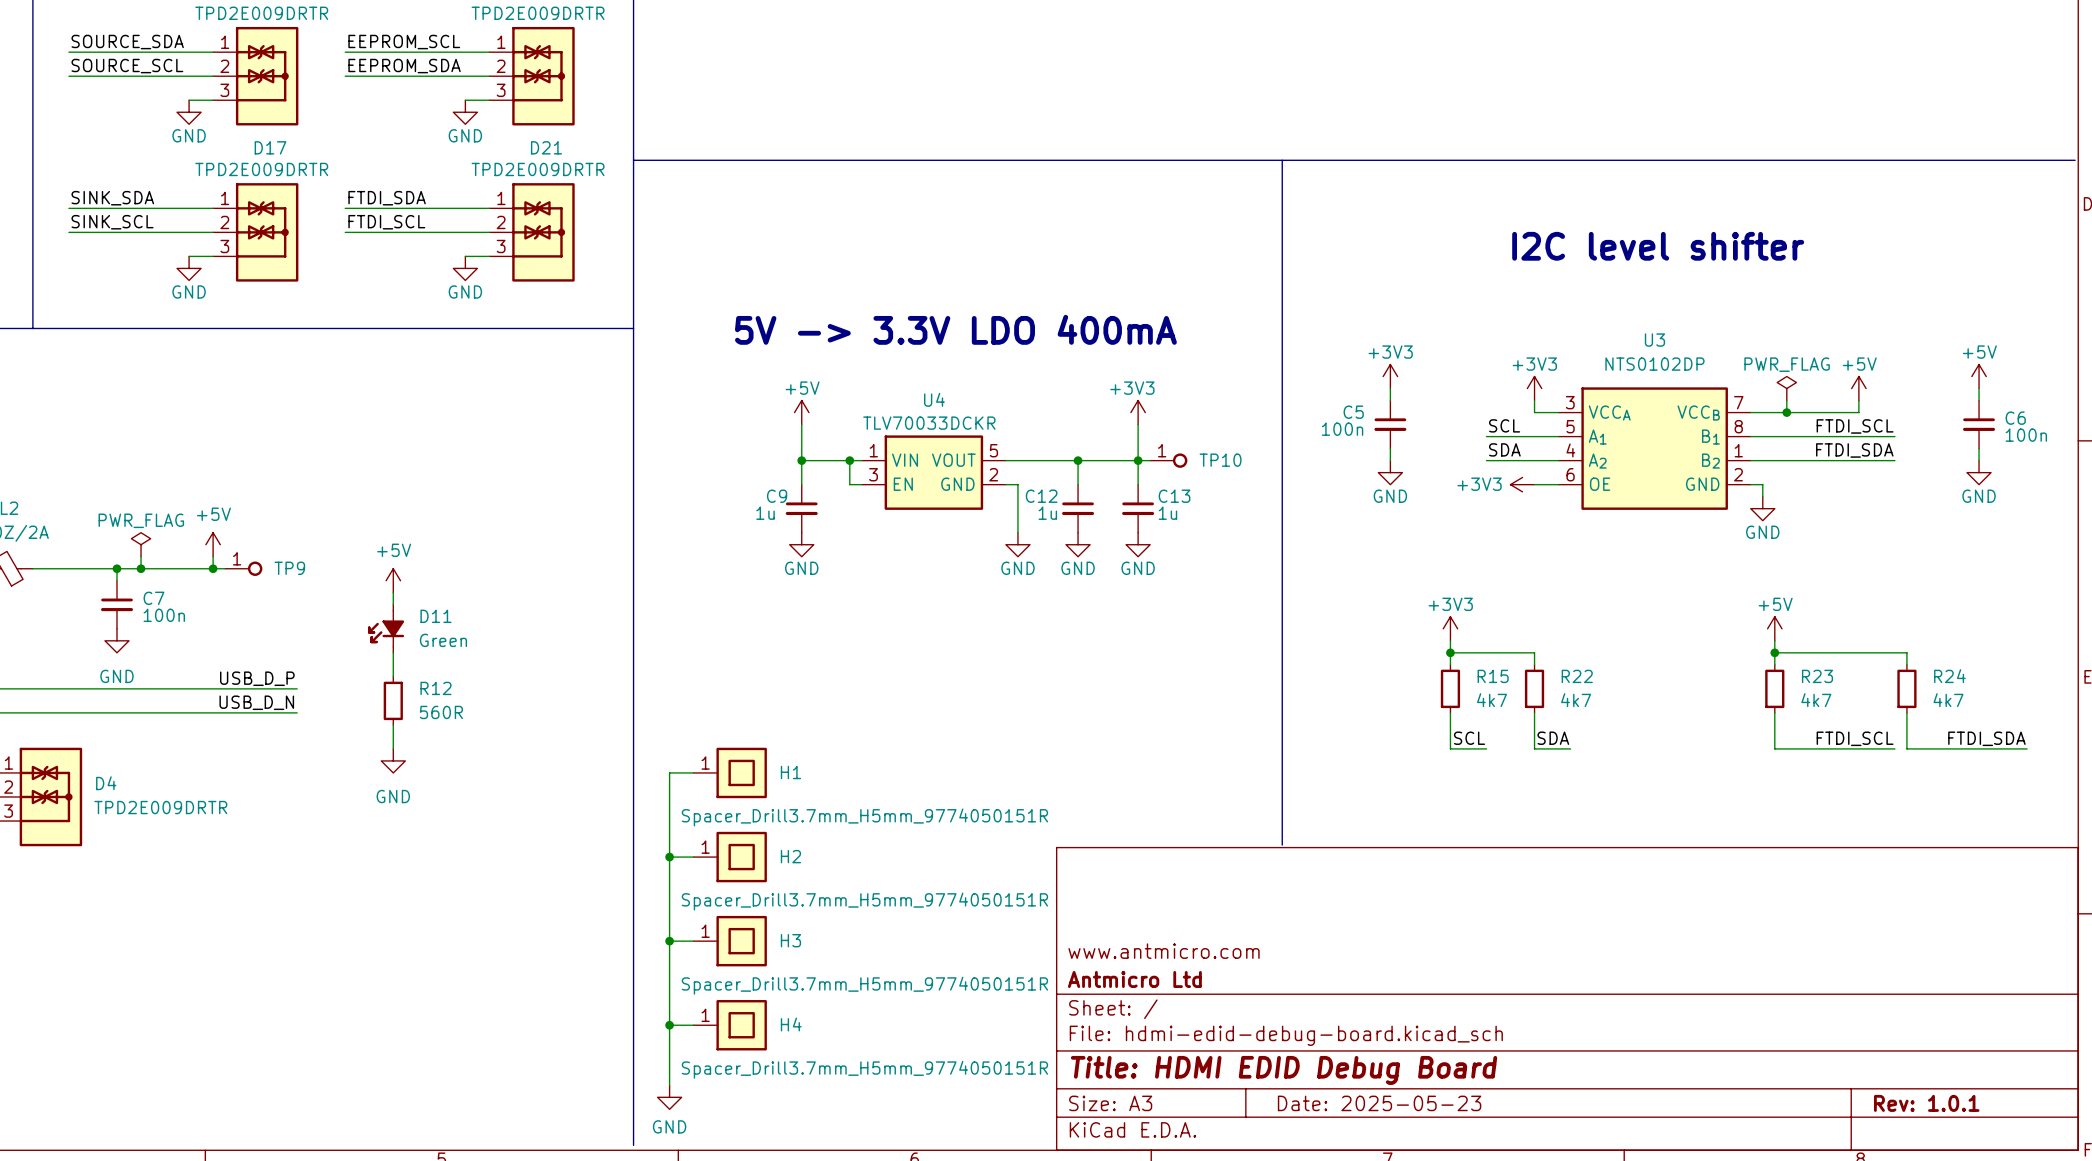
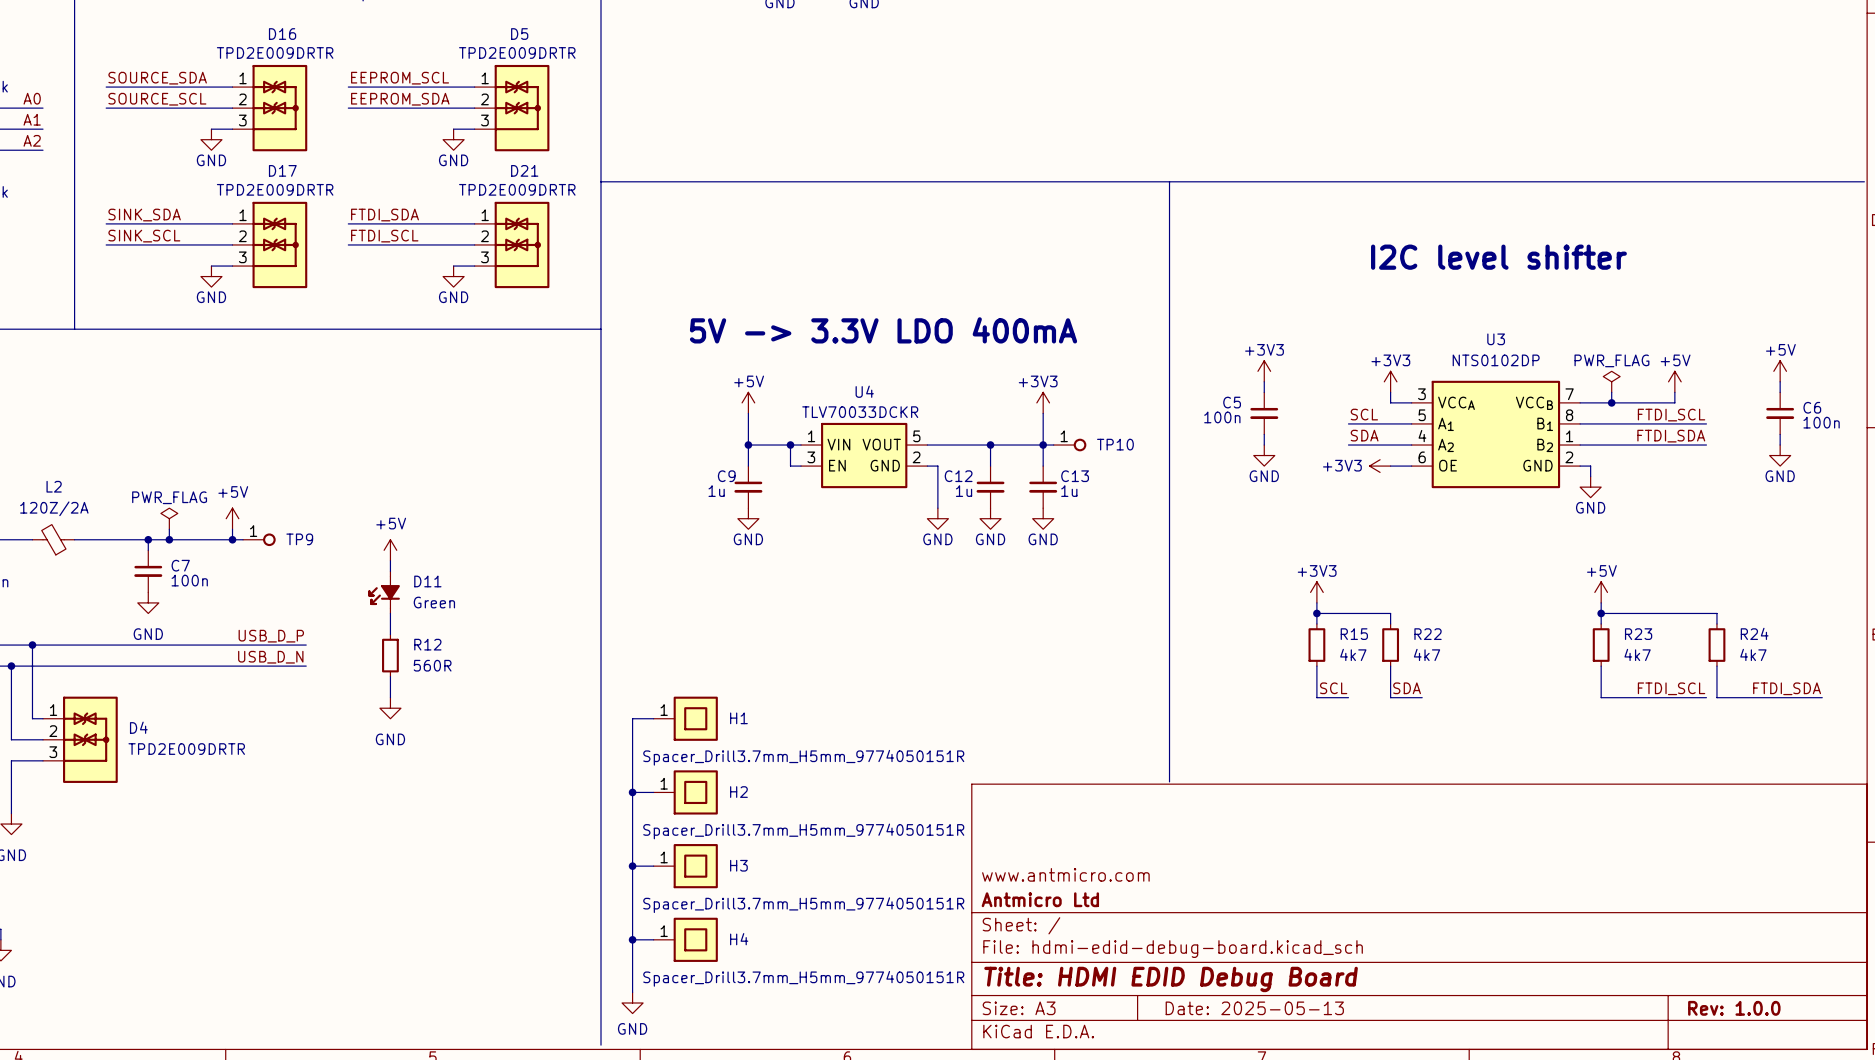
title block: Date: 2025-05-23 (1379, 1103) -> Date: 2025-05-13 (1254, 1008)
title block: Rev: 1.0.1 (1926, 1103) -> Rev: 1.0.0 (1734, 1008)

